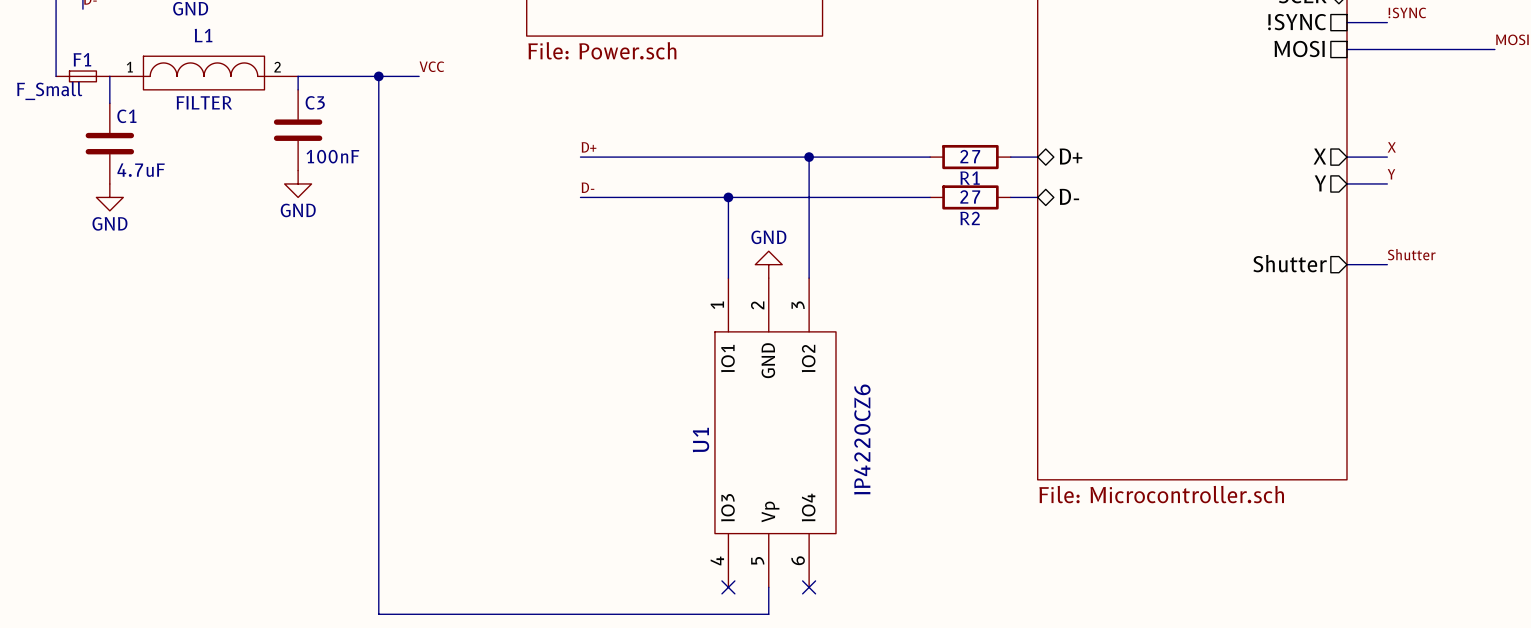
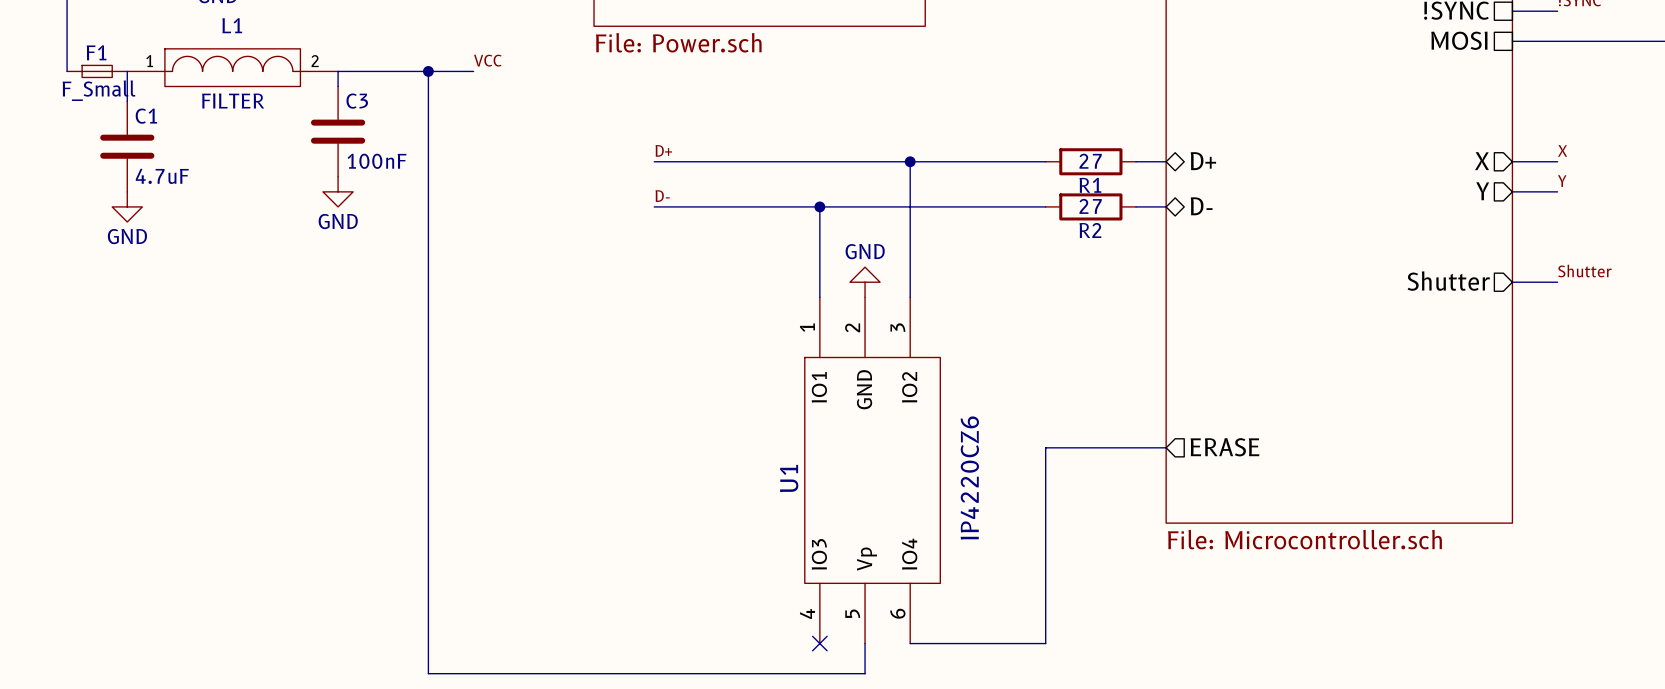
F1 value position: F_Small (49, 90) -> F_Small (99, 90)
wire: none -> (1166, 447) (1045, 447) (1045, 643) (910, 643)
sheet pin: none -> ERASE (1225, 447)
no-connect mark: (809, 587) -> none

